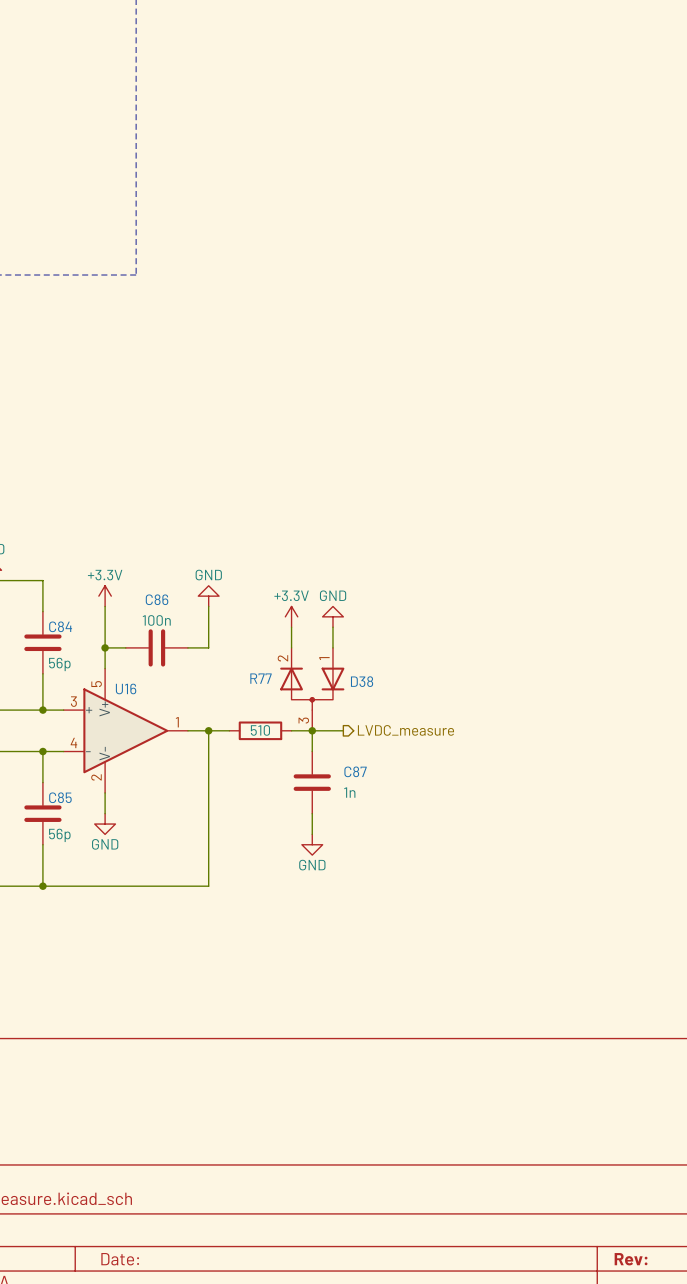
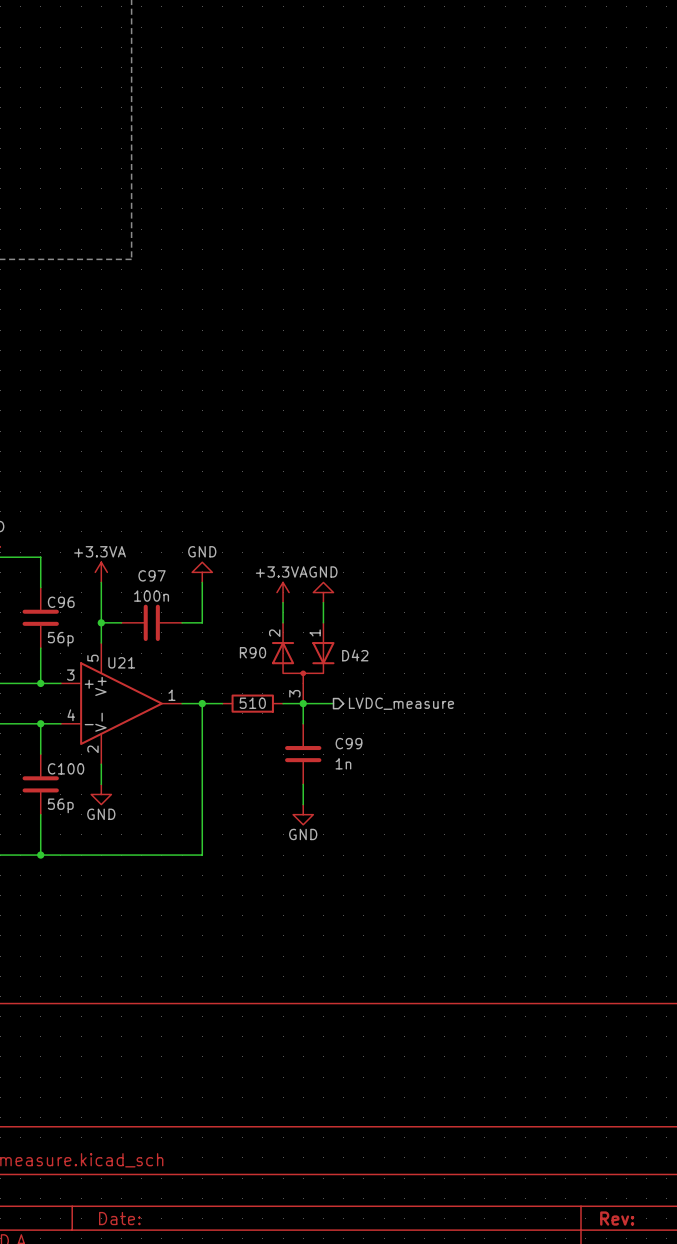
power symbol: +3.3V (105, 596) -> +3.3VA (101, 572)
C86 name: C86 (157, 599) -> C97 (152, 575)
power symbol: +3.3V (291, 616) -> +3.3VA (283, 592)
C84 name: C84 (60, 626) -> C96 (61, 602)
R77 name: R77 (261, 678) -> R90 (252, 652)
D38 name: D38 (362, 681) -> D42 (355, 655)
U16 name: U16 (126, 688) -> U21 (121, 662)
C87 name: C87 (355, 771) -> C99 (348, 743)
C85 name: C85 (60, 797) -> C100 (66, 768)

